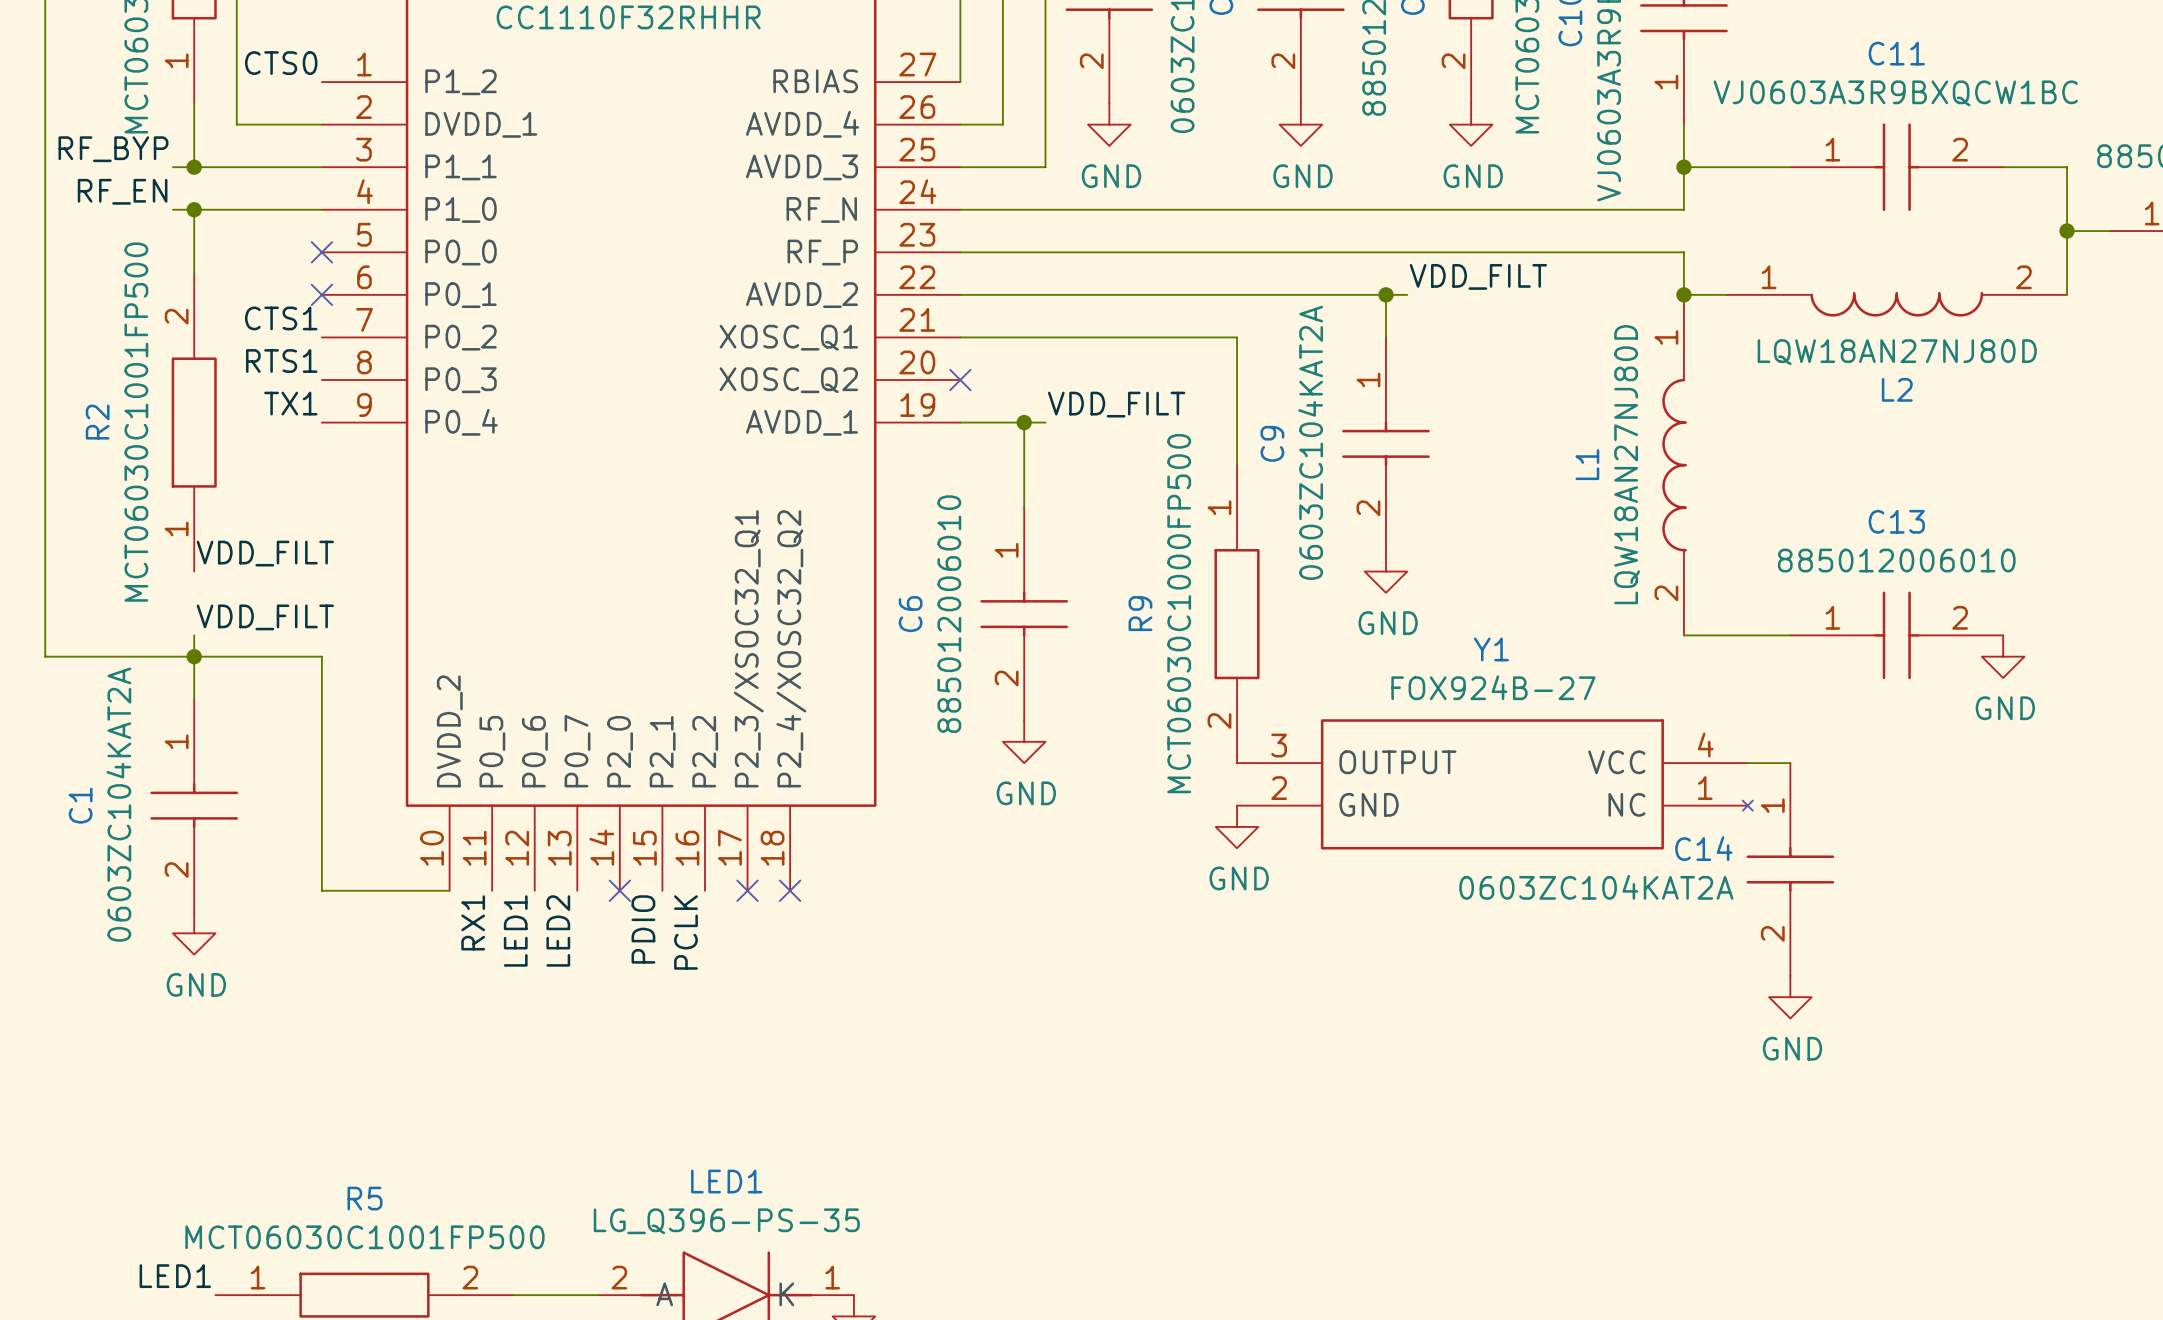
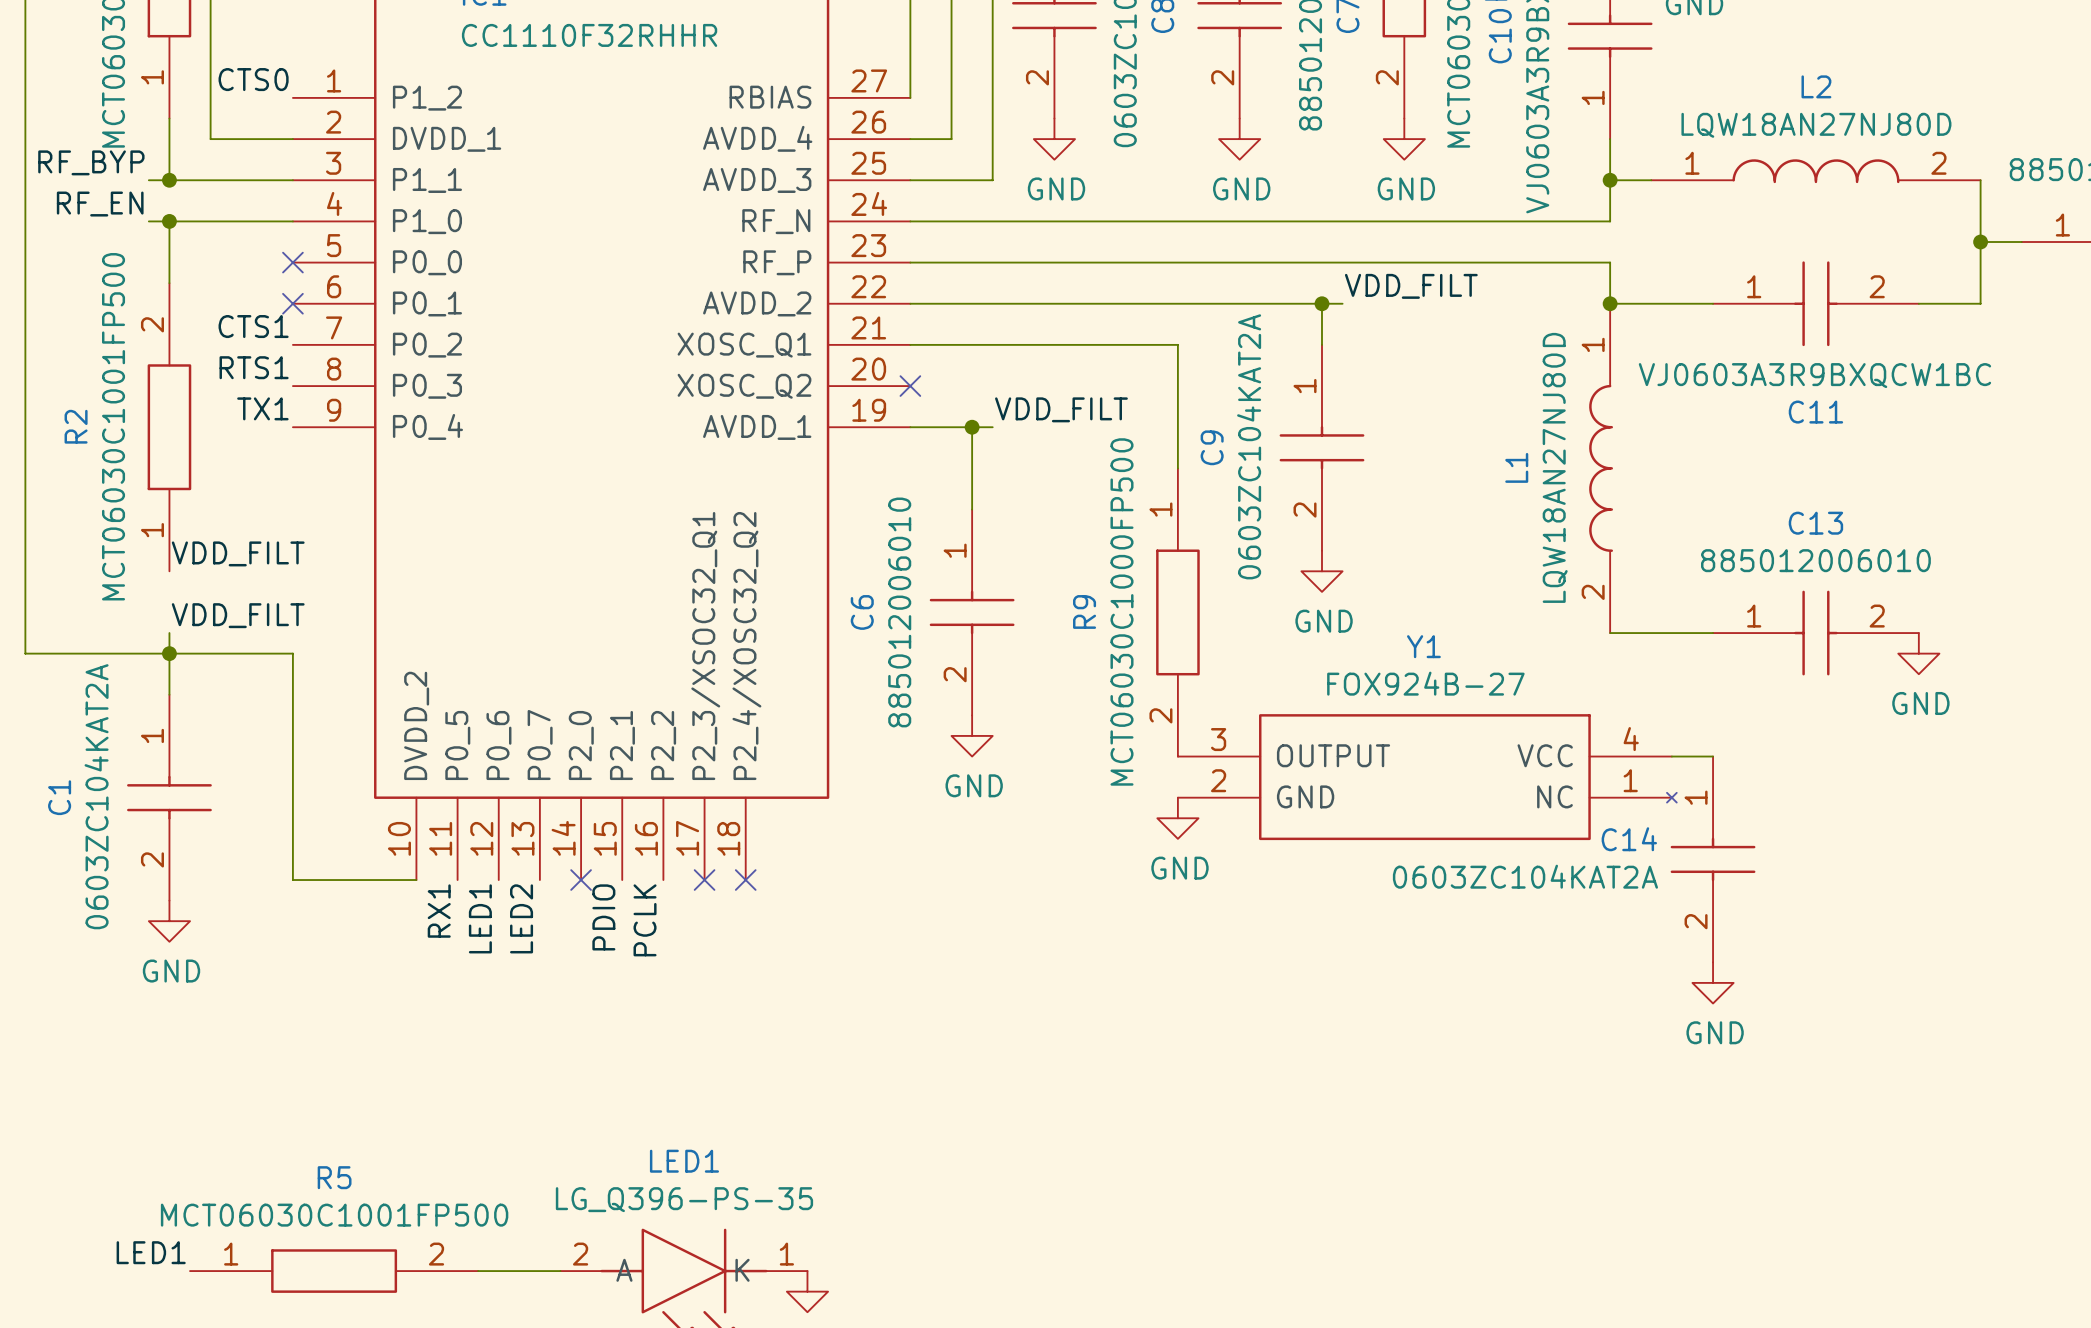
C11 name position: C11 (1896, 53) -> C11 (1815, 412)
C11 value position: VJ0603A3R9BXQCW1BC (1895, 93) -> VJ0603A3R9BXQCW1BC (1814, 375)
C11 position: (1896, 167) -> (1815, 303)
L2 flip: as is (1896, 304) -> up-down (1815, 171)

